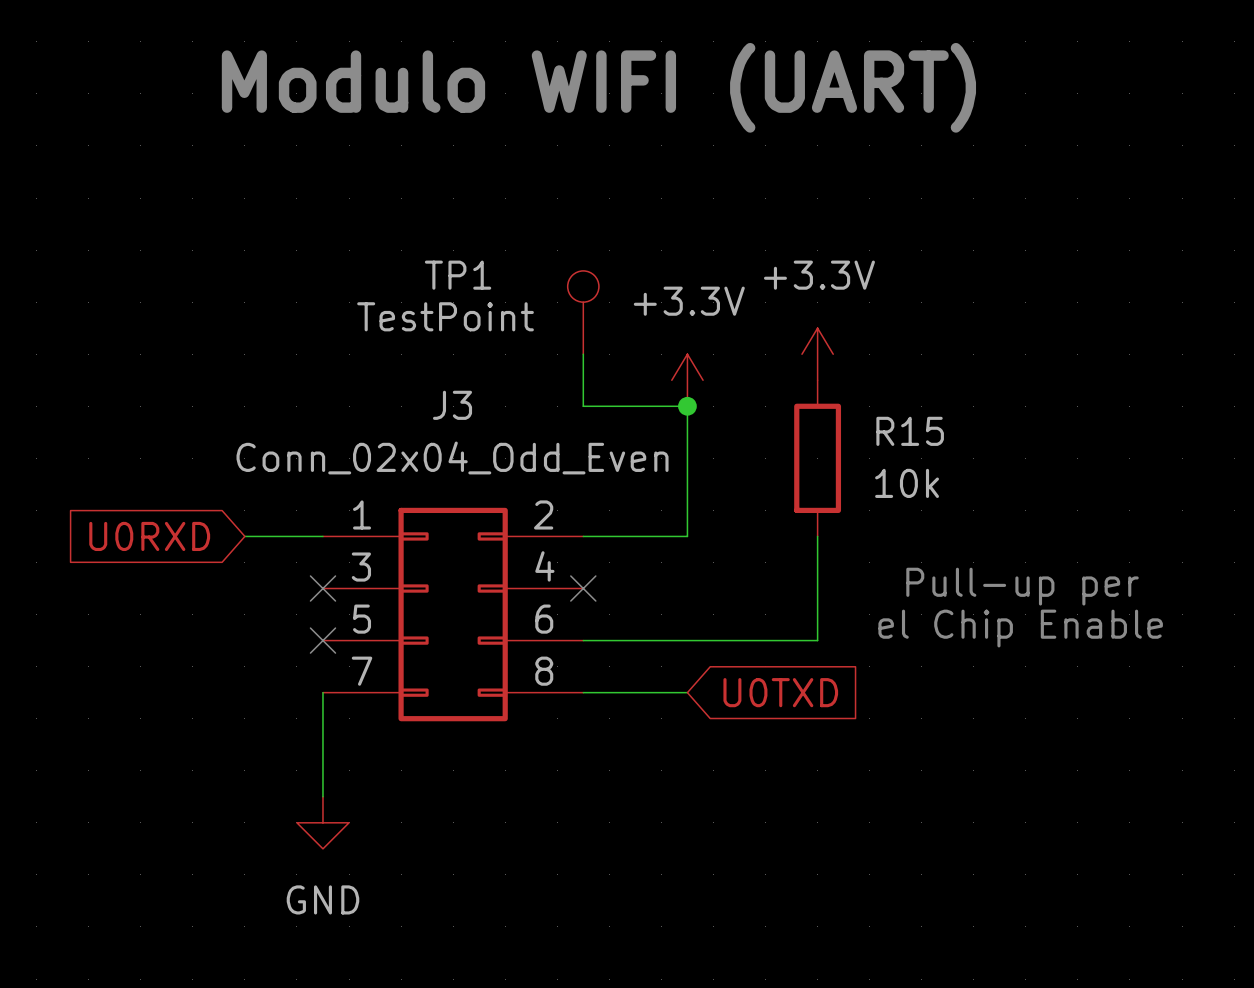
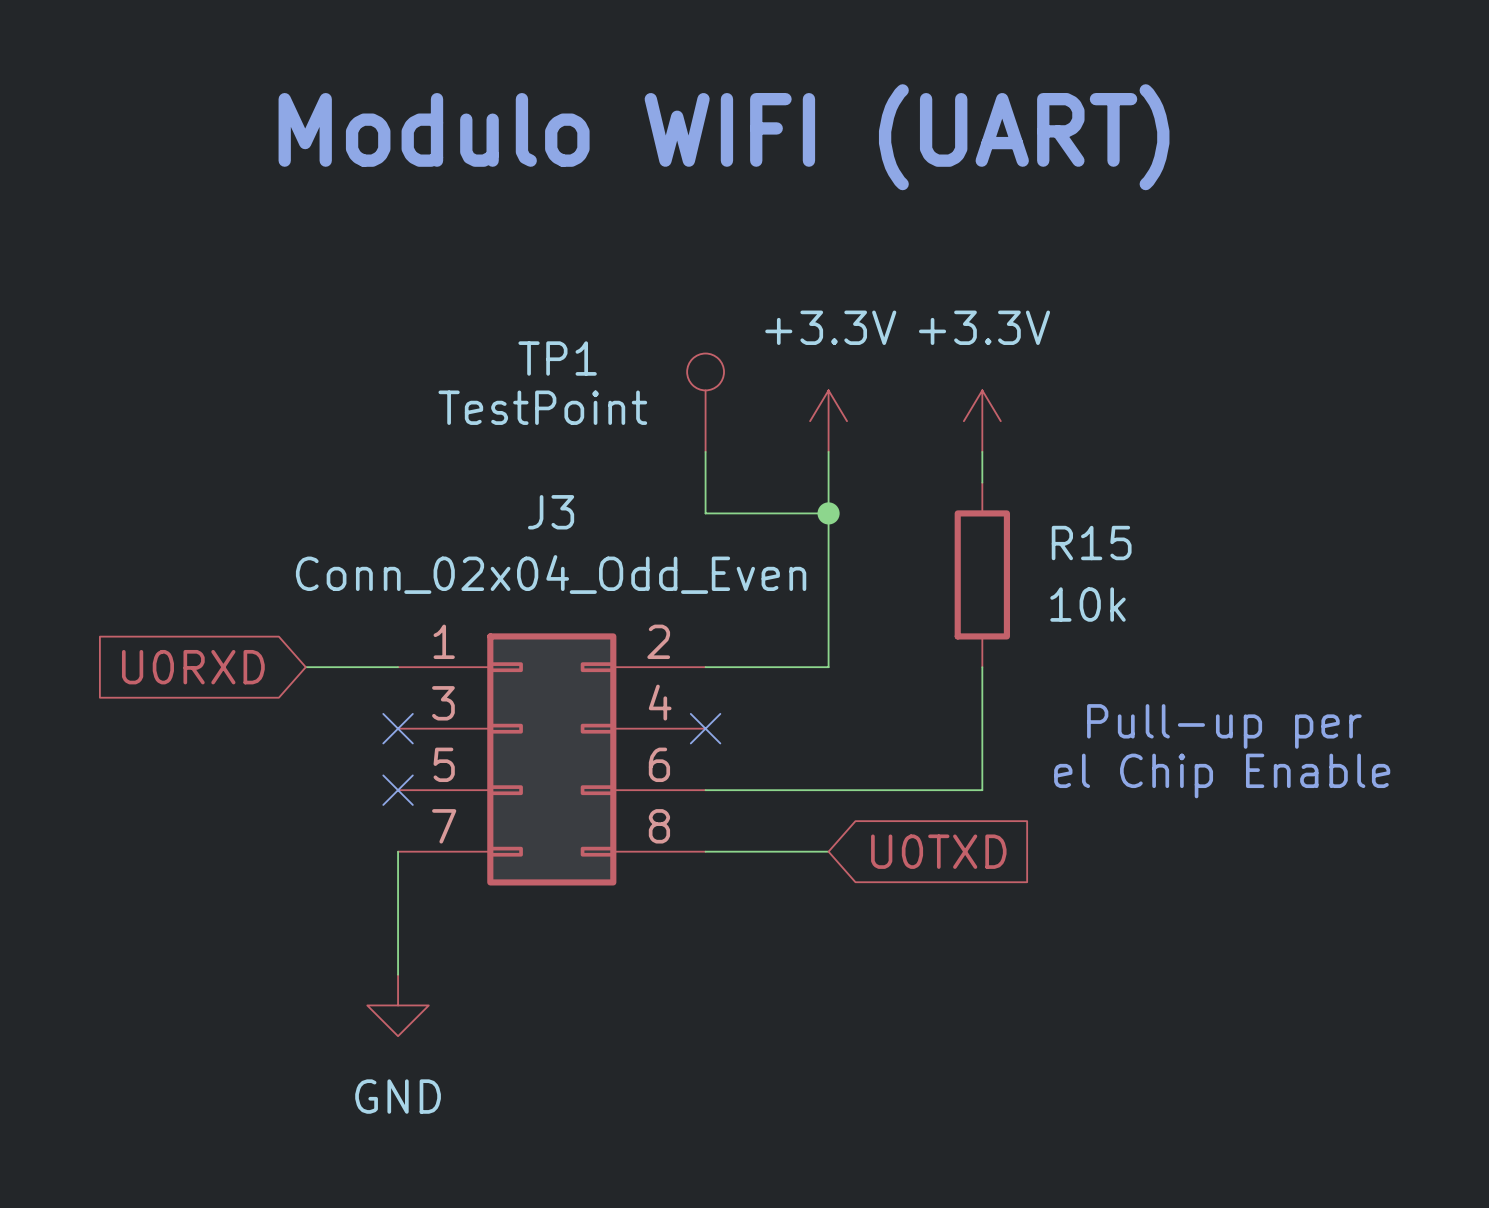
power symbol position: +3.3V (817, 354) -> +3.3V (982, 421)
power symbol position: +3.3V (687, 380) -> +3.3V (828, 421)

